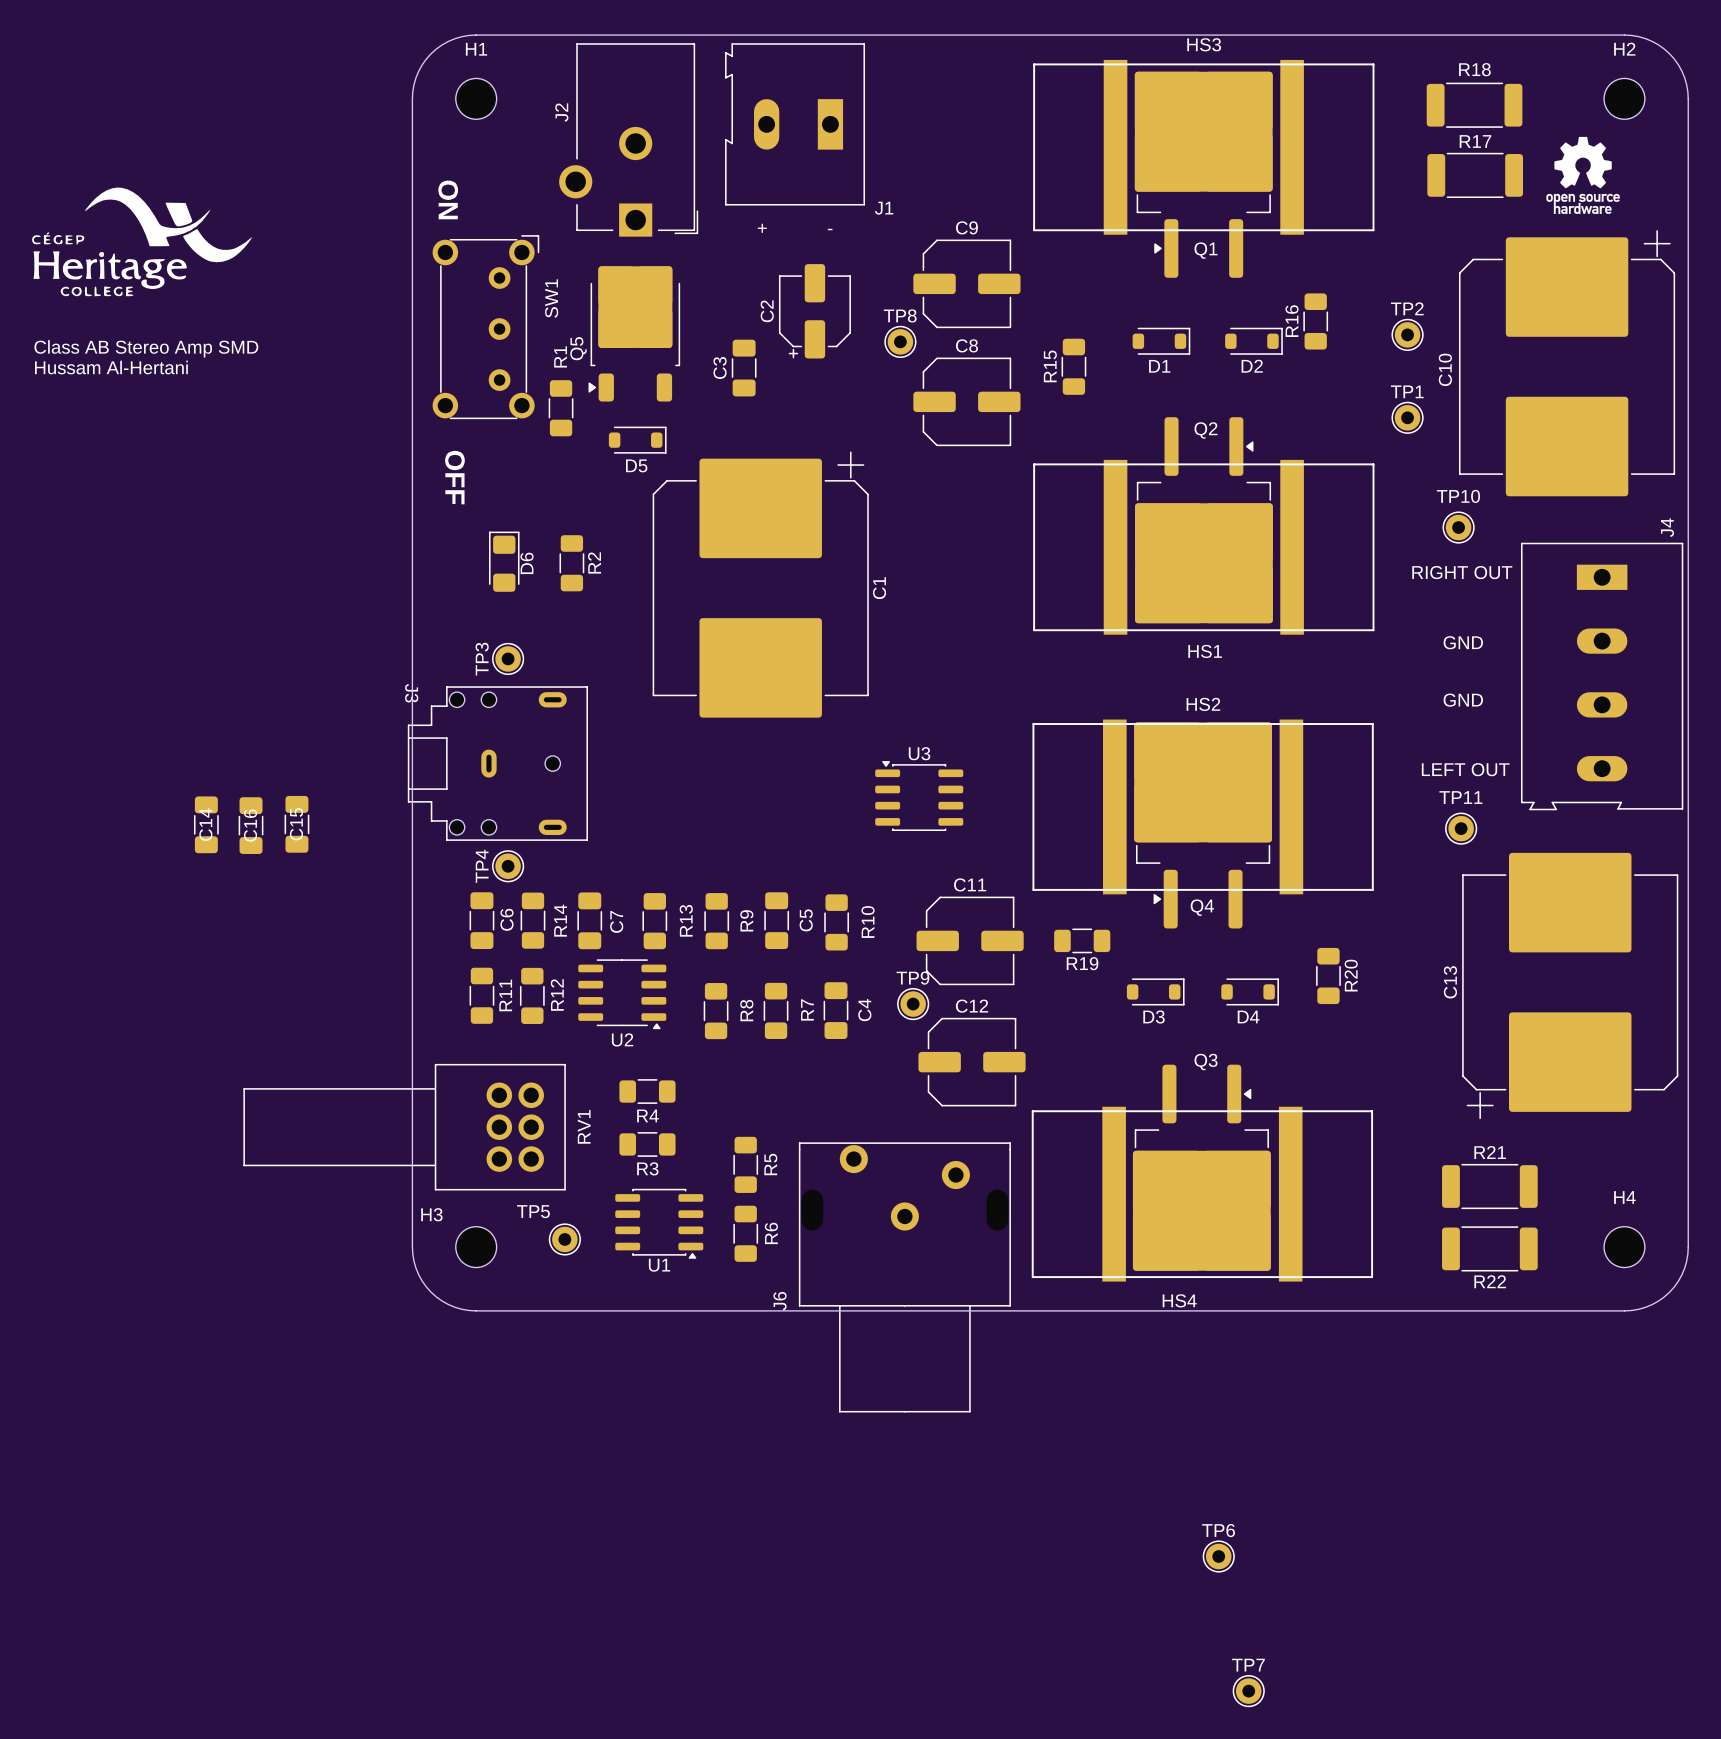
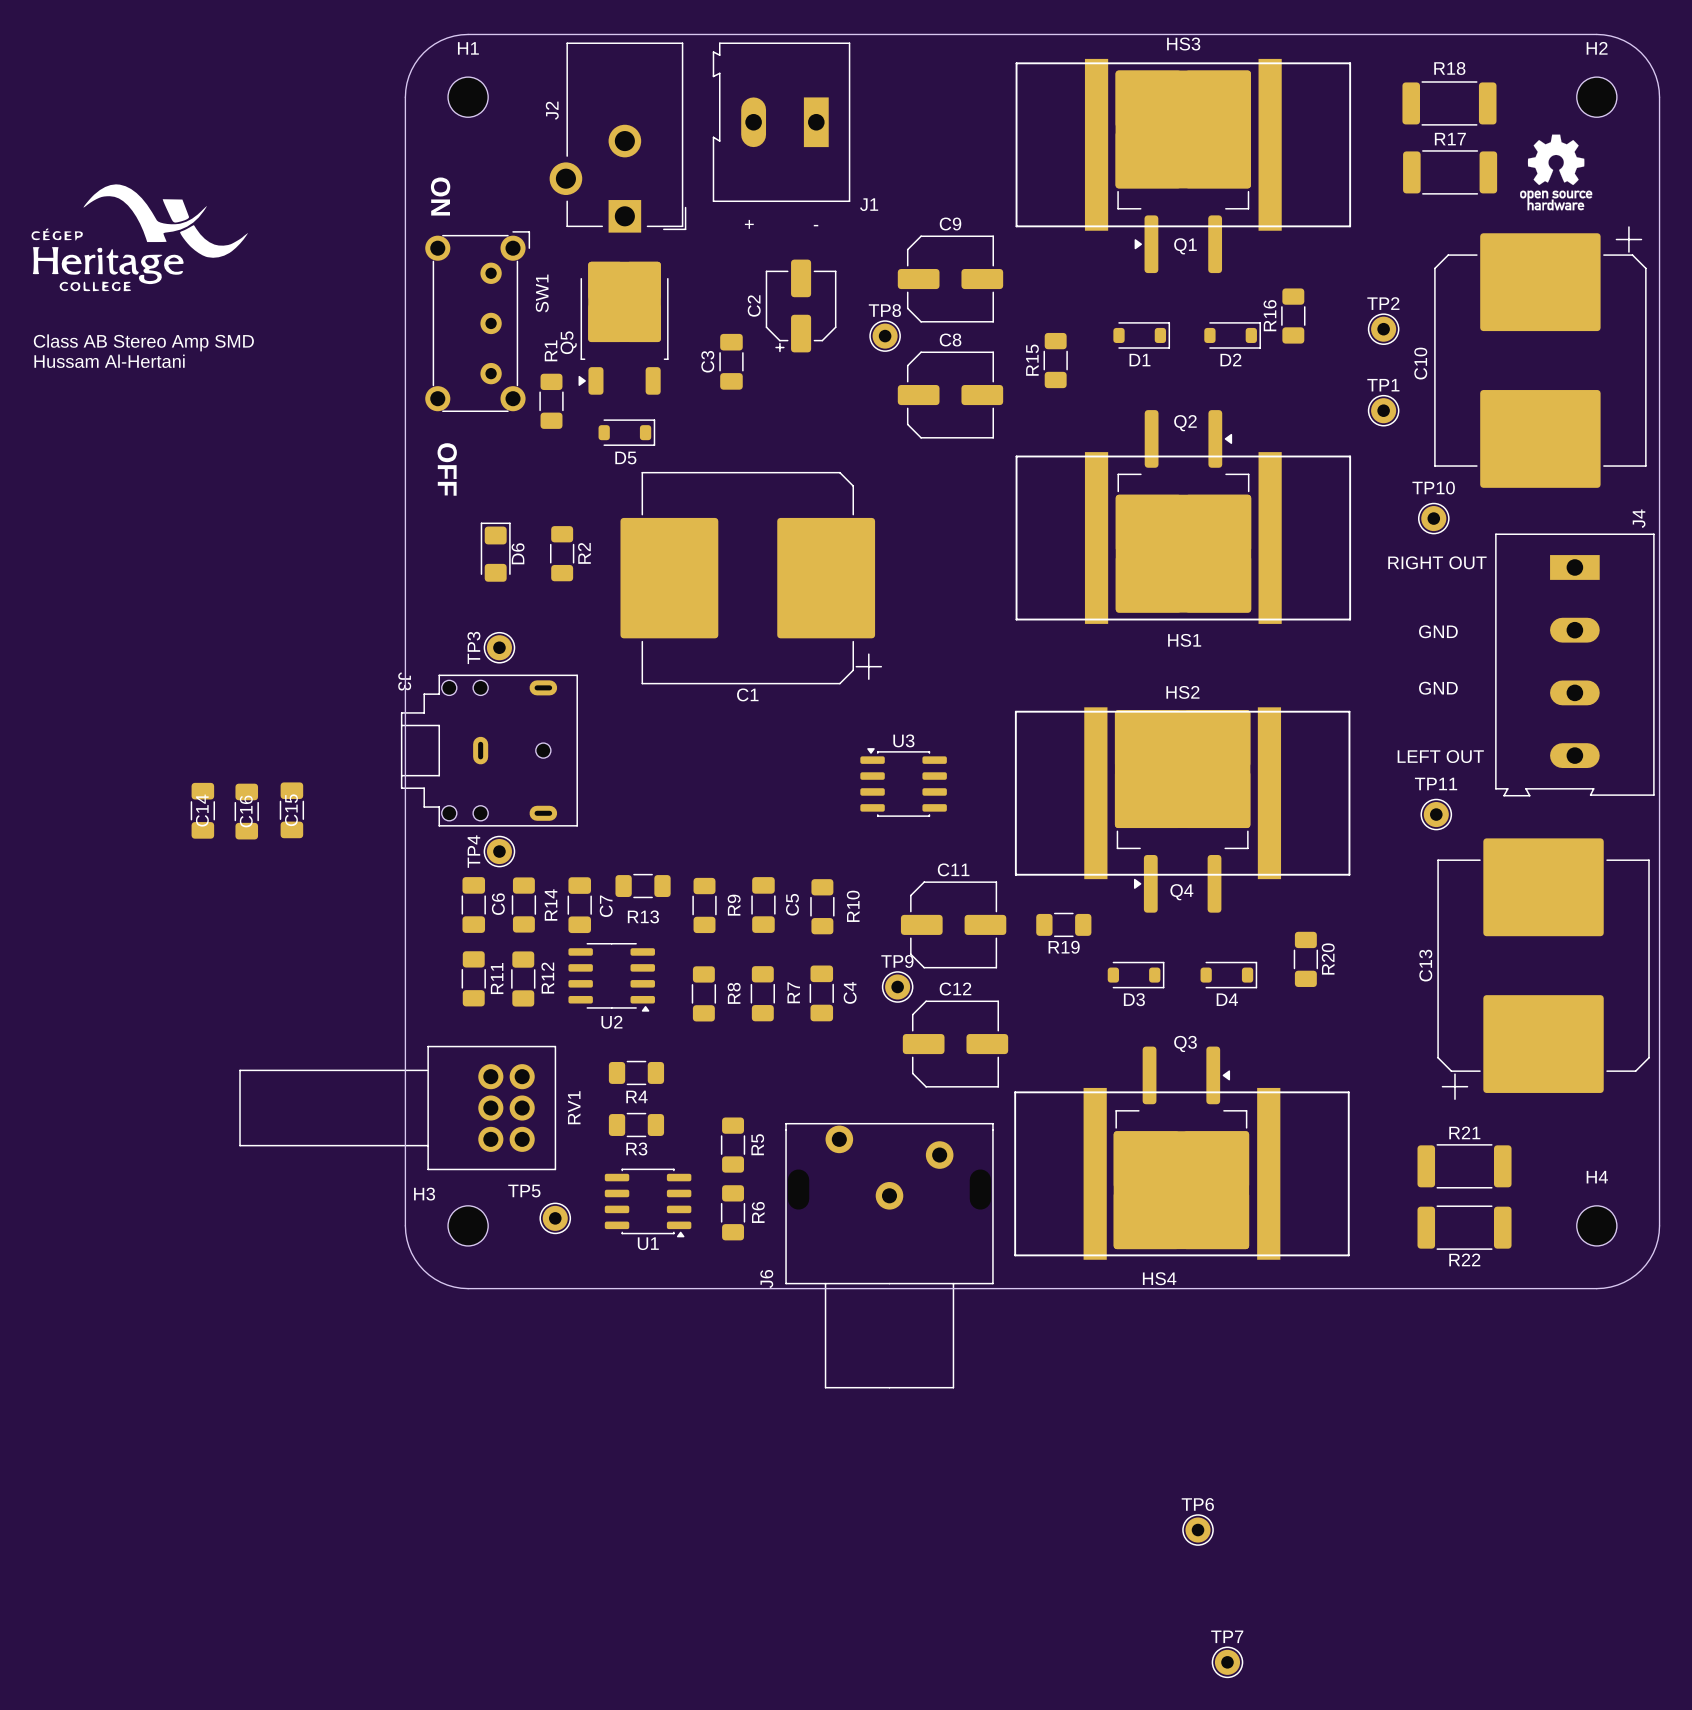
C1 rotation: 0° (760, 584) -> 90° clockwise (751, 578)
R13 rotation: 0° (654, 921) -> 90° clockwise (643, 886)

